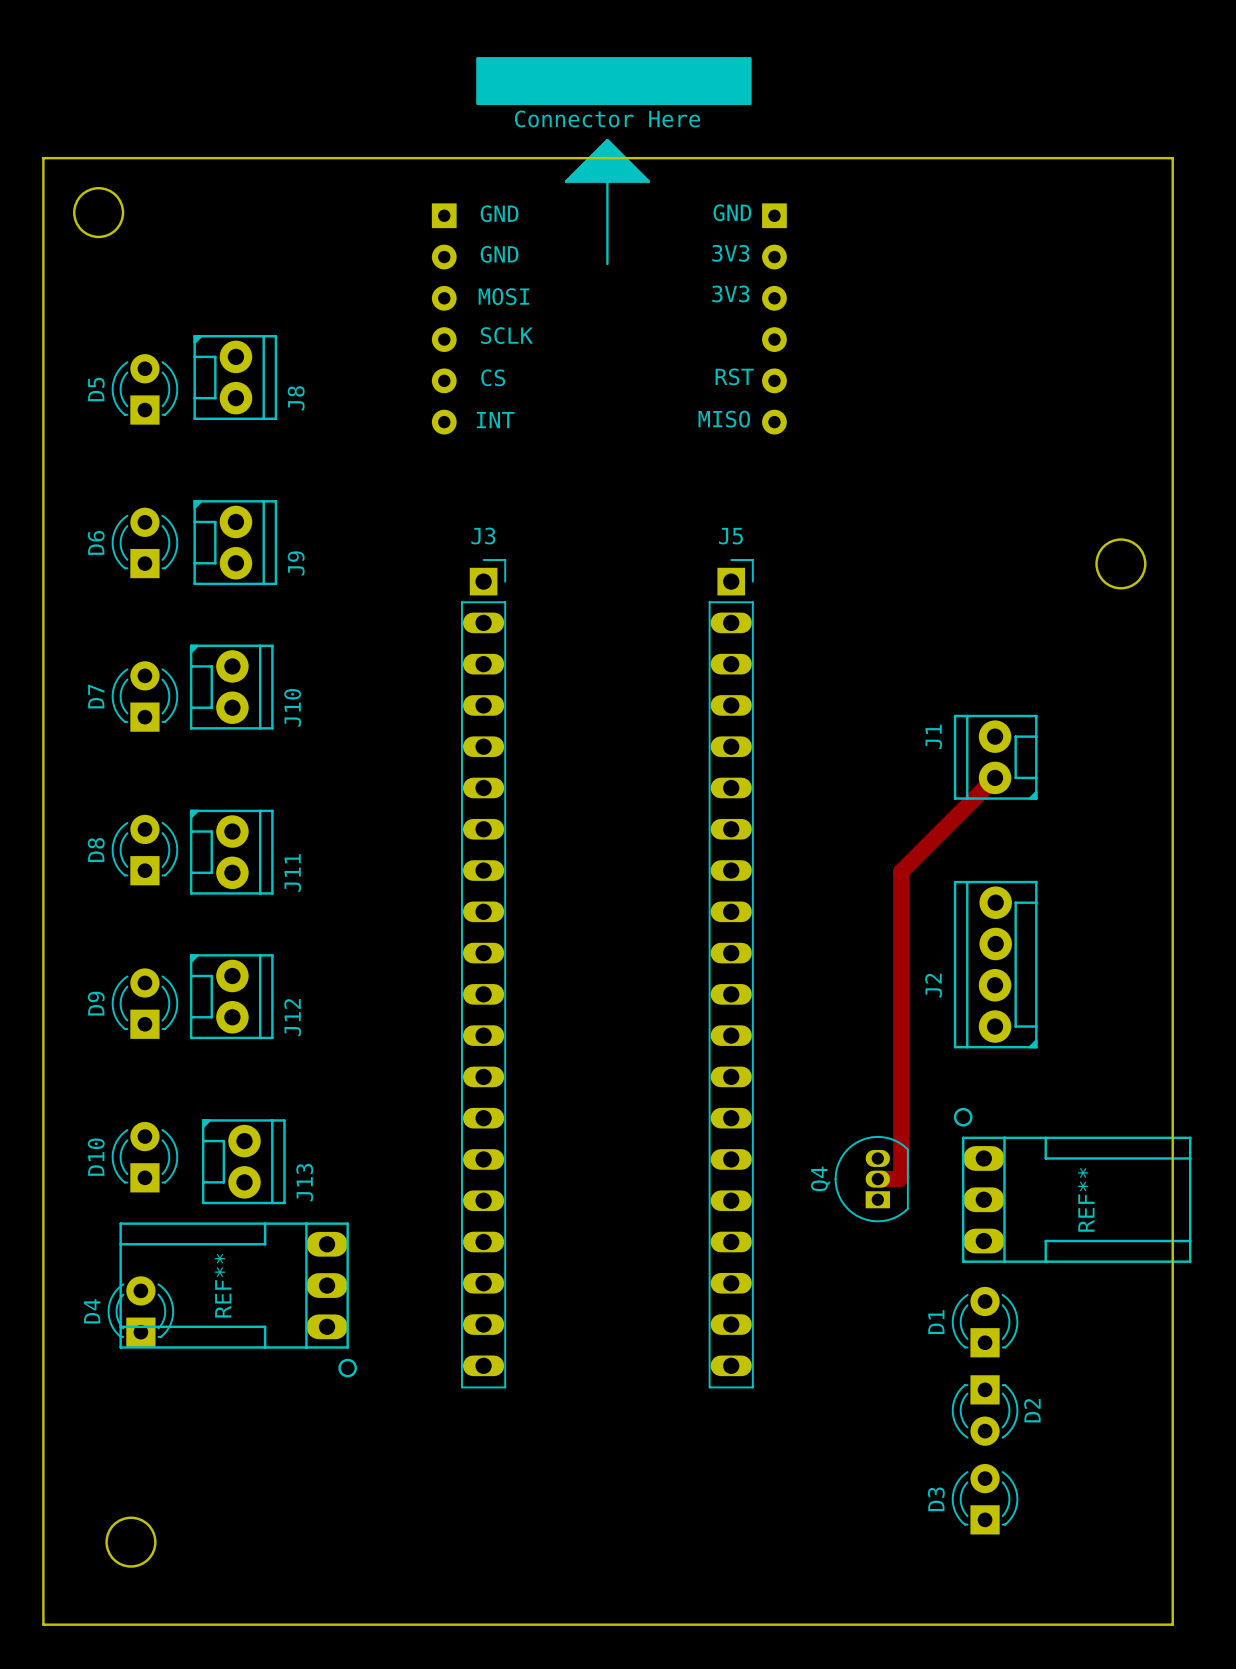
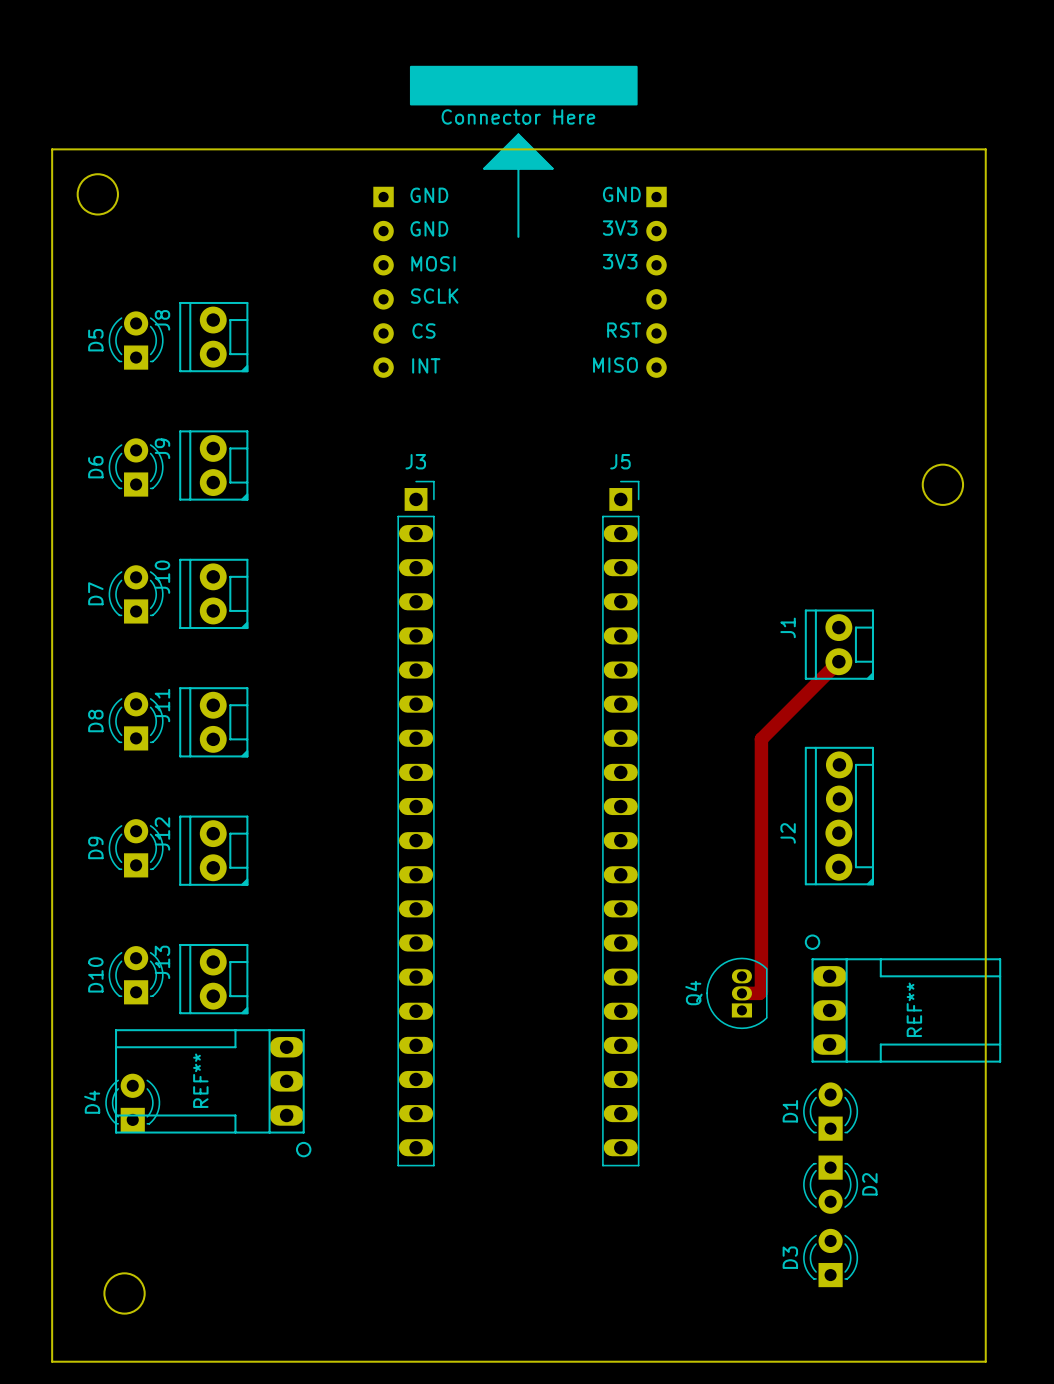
J8 rotation: 0° (235, 377) -> 180° (213, 337)
J9 rotation: 0° (235, 542) -> 180° (213, 465)
J10 rotation: 0° (231, 687) -> 180° (213, 593)
J11 rotation: 0° (231, 852) -> 180° (213, 722)
J12 rotation: 0° (231, 996) -> 180° (213, 850)
J13 rotation: 0° (243, 1161) -> 180° (213, 979)

